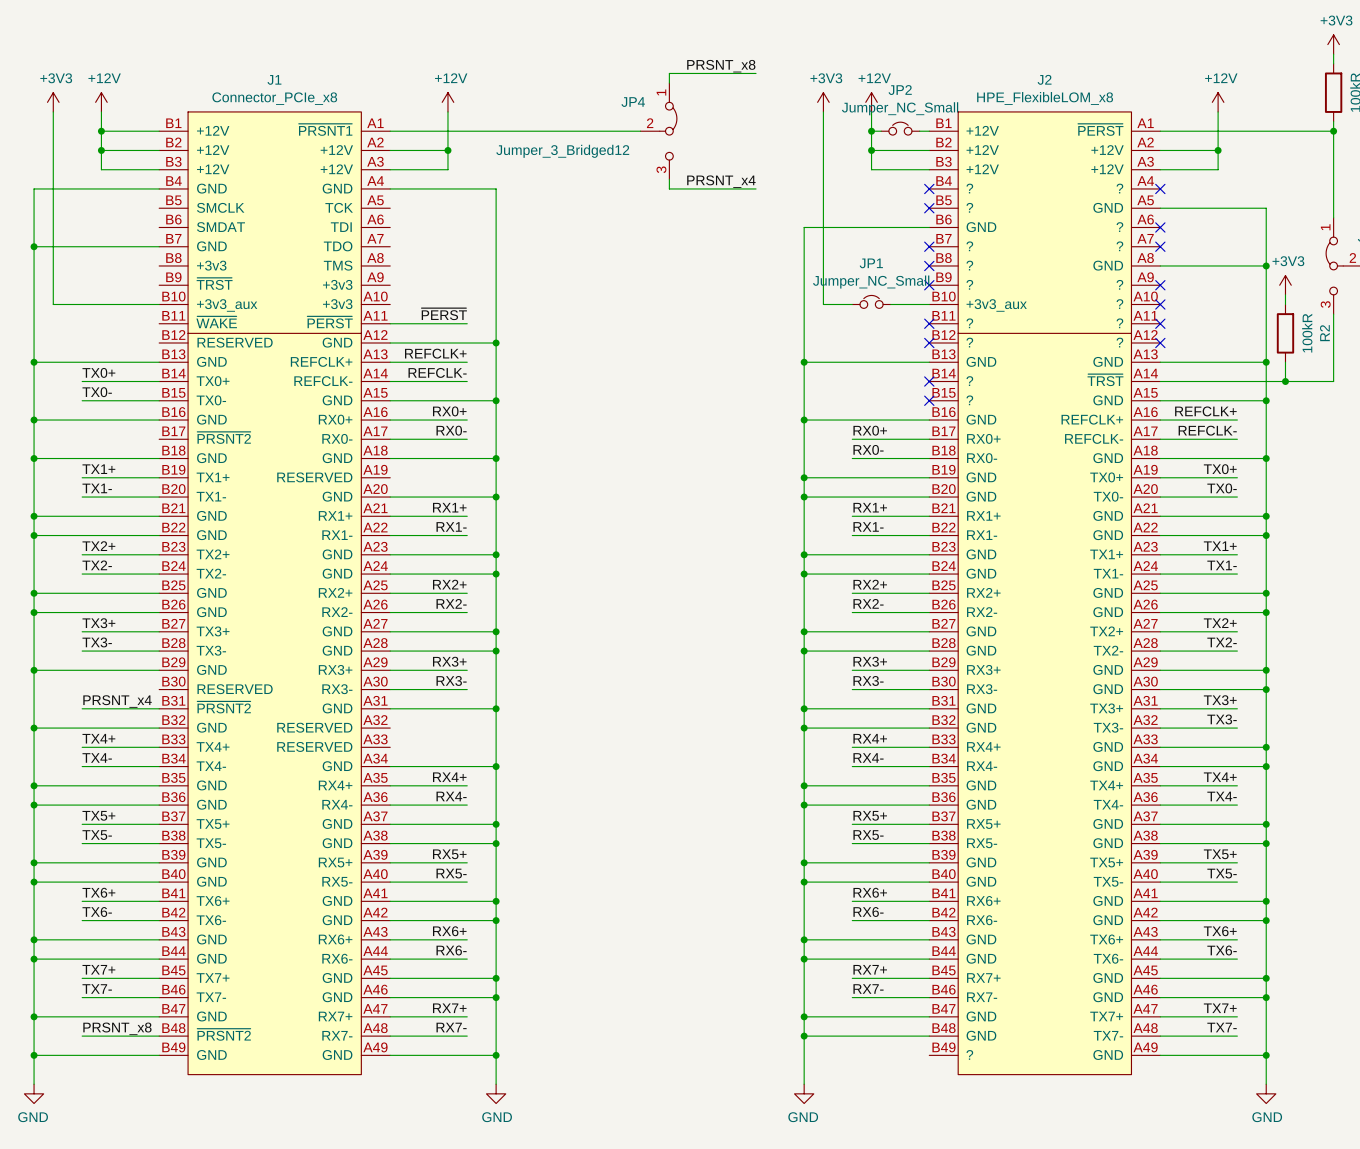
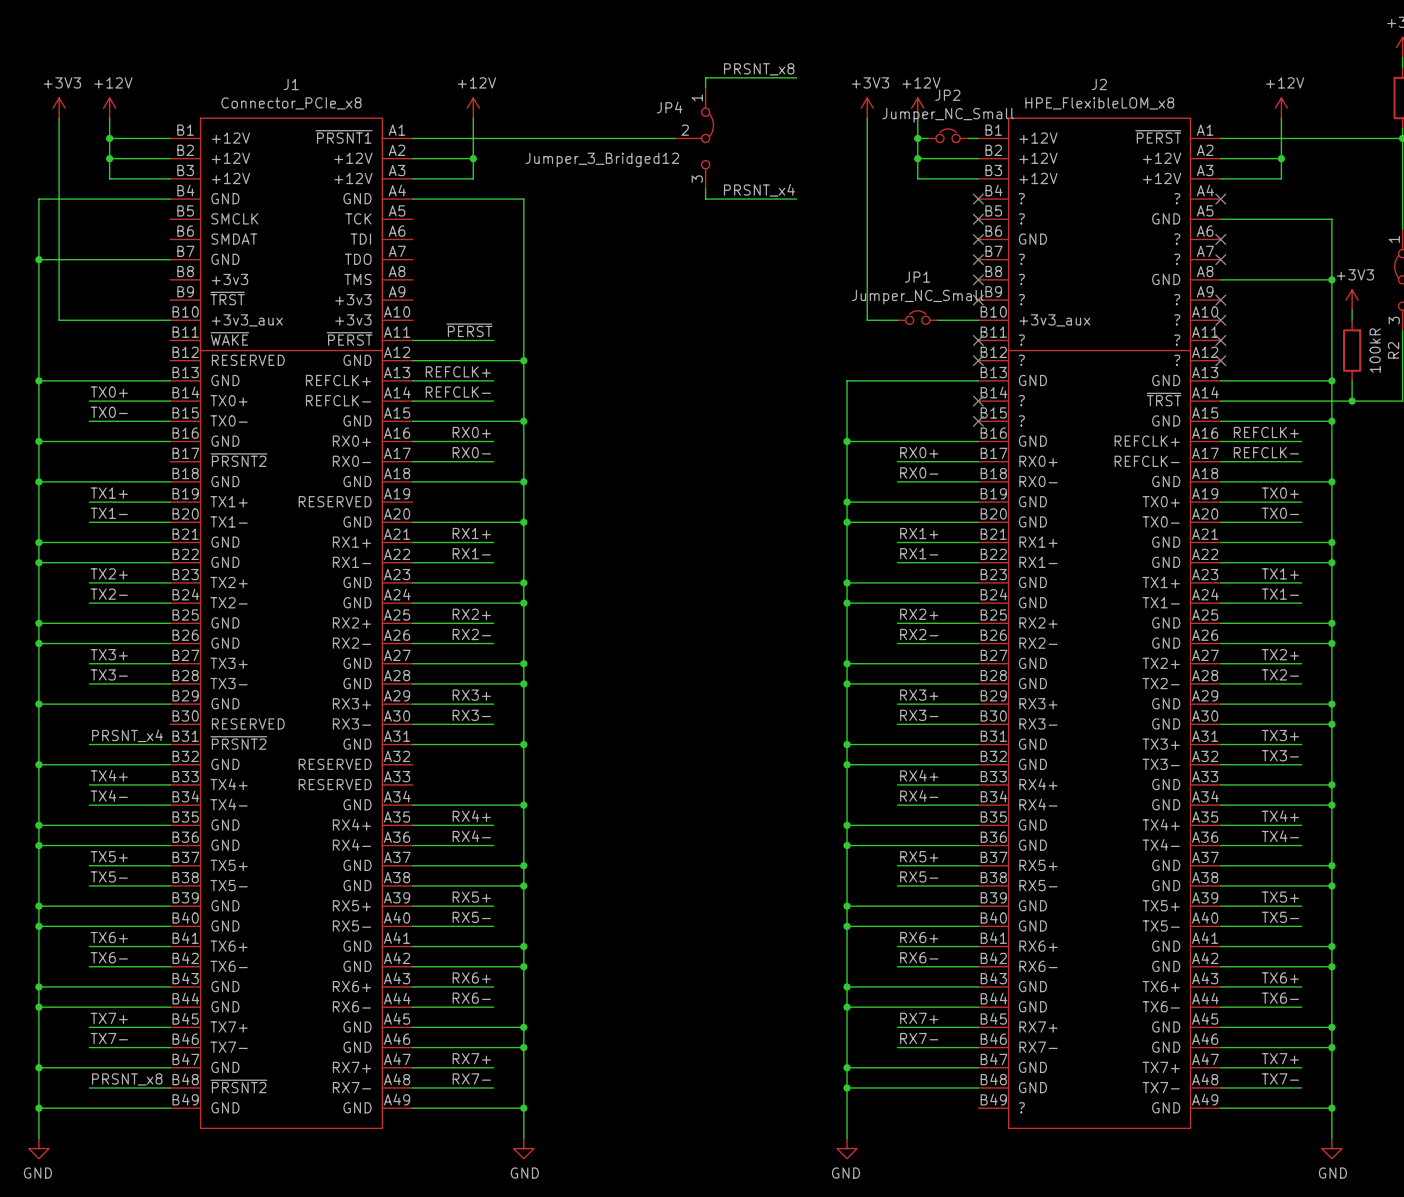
wire: (929, 227) (804, 227) (804, 362) -> none
no-connect mark: none -> (978, 239)
junction: (804, 362) -> none

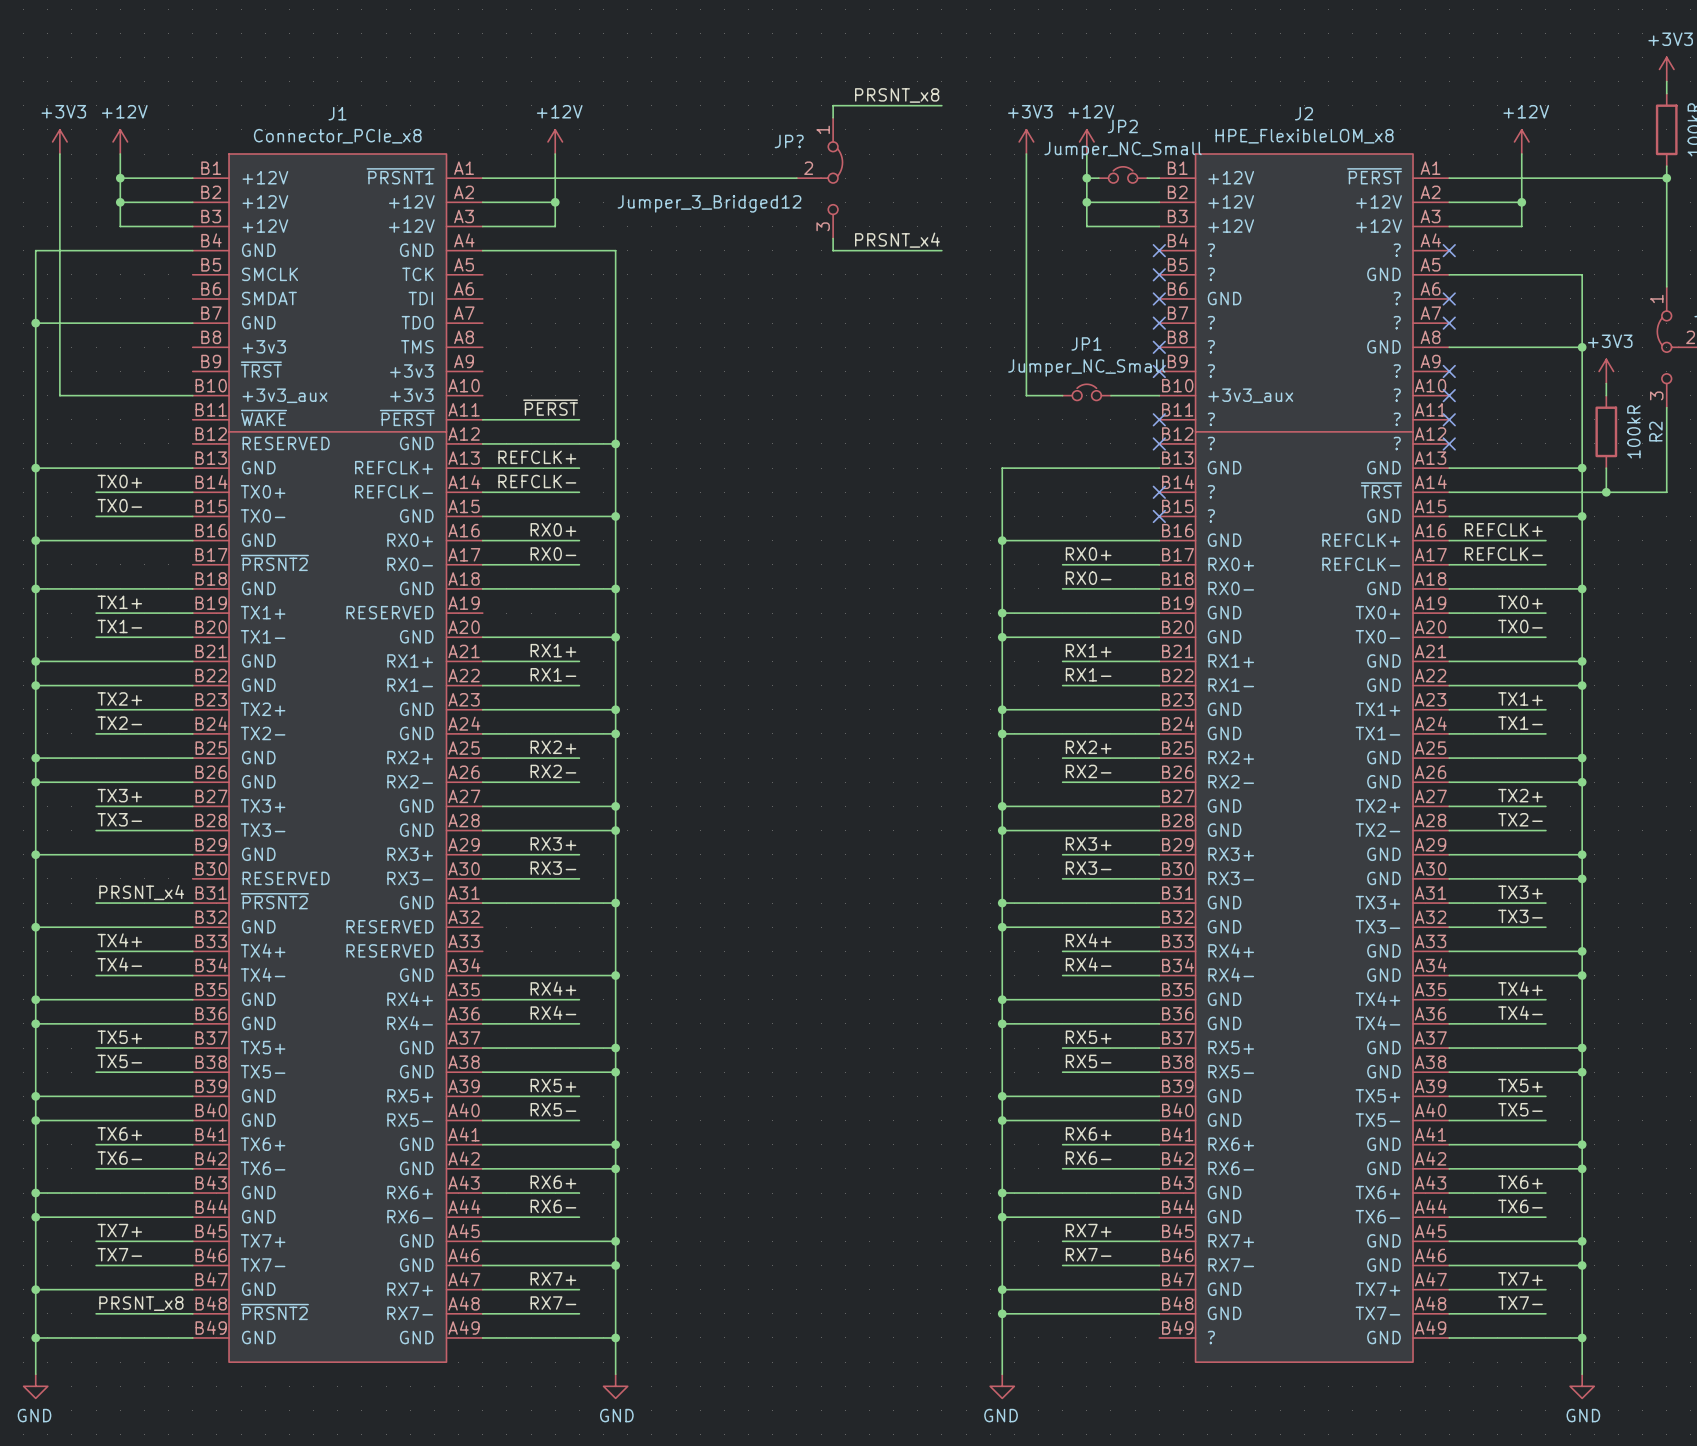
JP4 name: JP4 (669, 107) -> JP? (789, 141)

